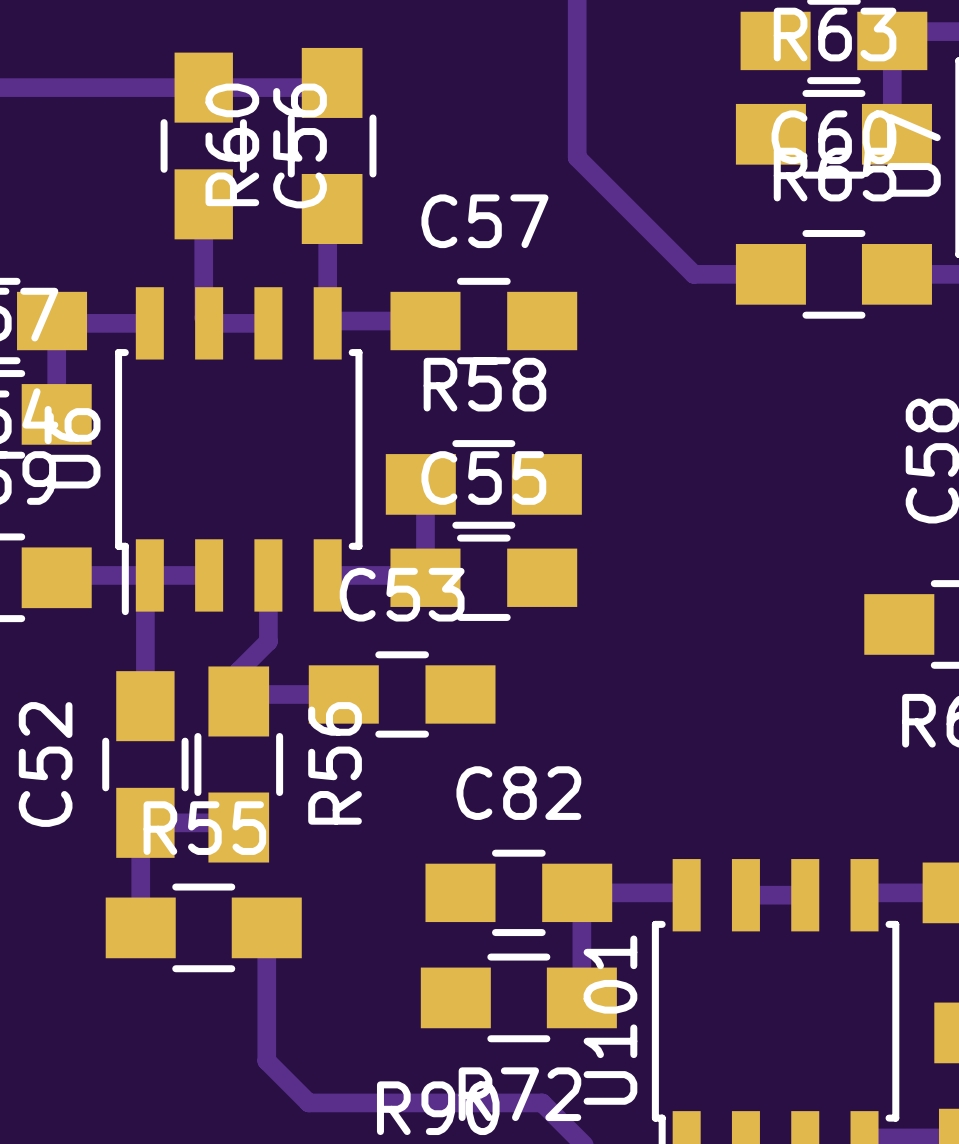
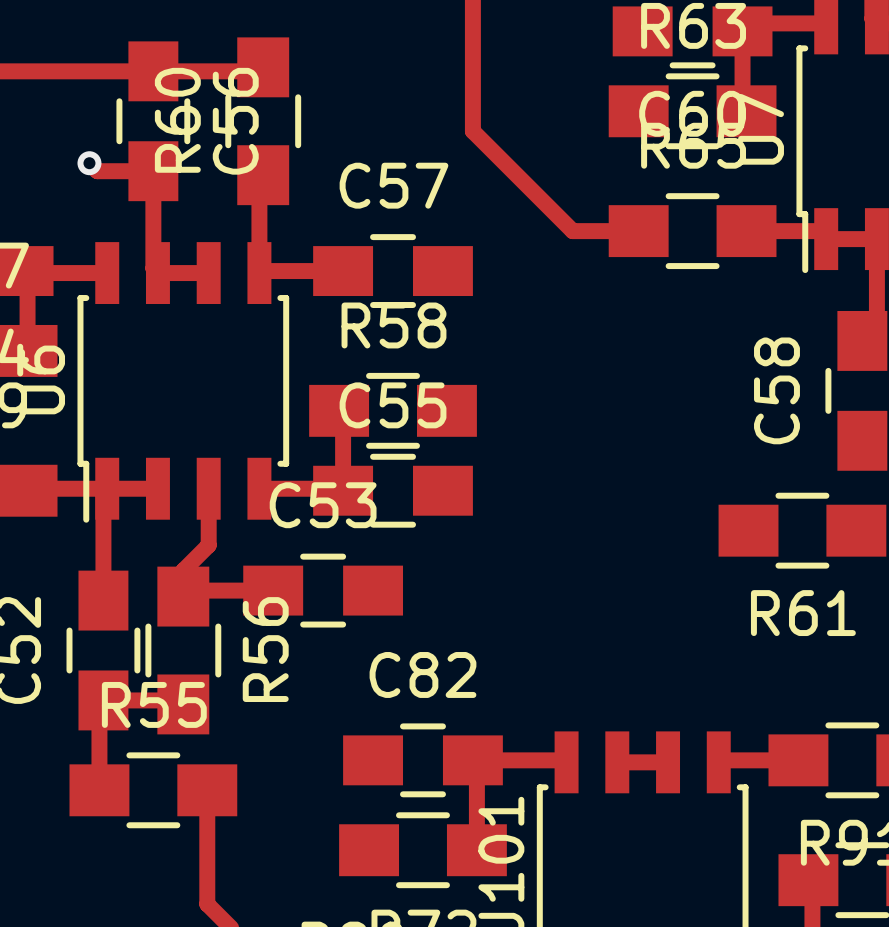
track: none -> (89, 163) (97, 171) (153, 171)
via: none -> (89, 163)

